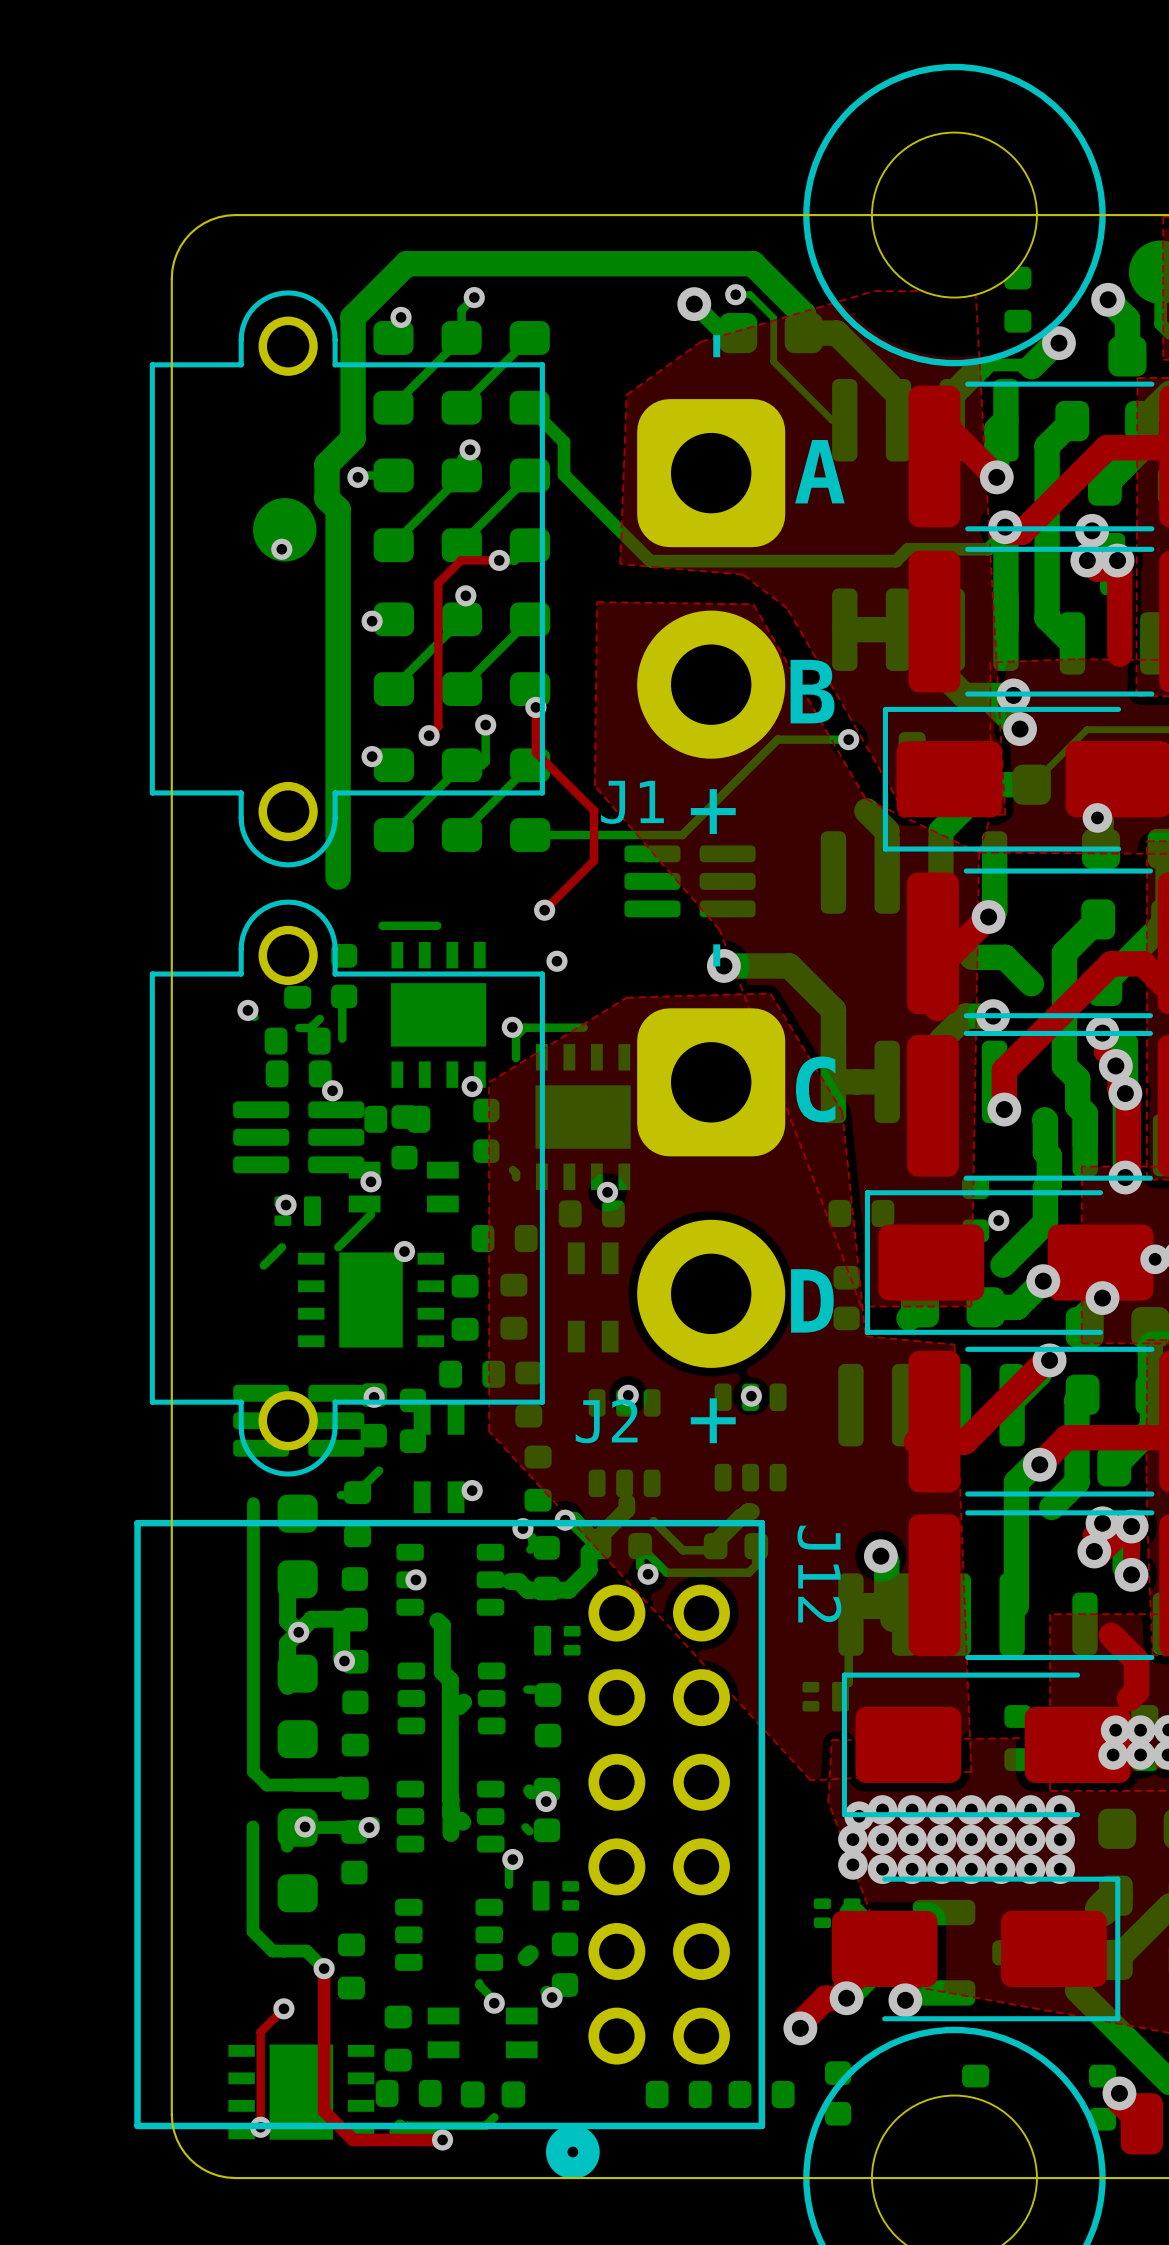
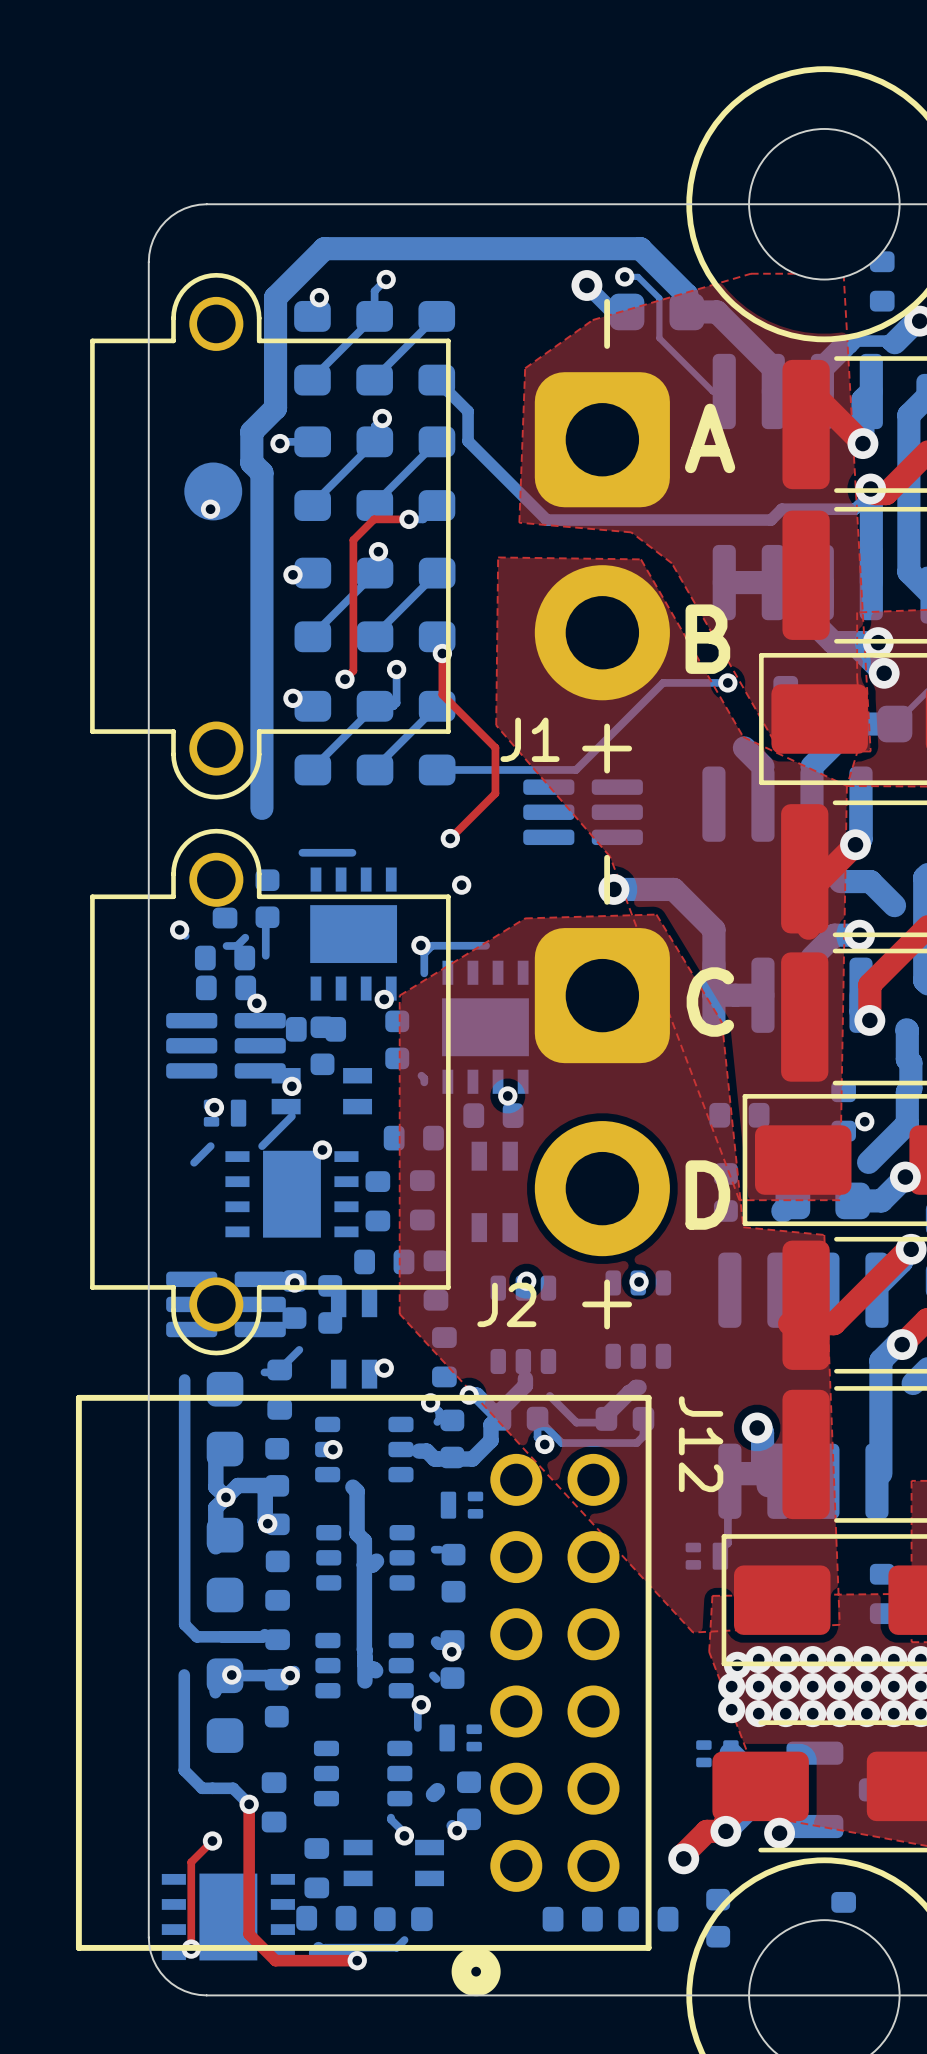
board edge: (277, 215) (226, 215) (203, 223) (190, 233) (180, 246) (173, 262) (171, 278) (171, 2114) (173, 2131) (180, 2146) (190, 2159) (203, 2169) (226, 2177) (277, 2178) -> (206, 204) (184, 208) (165, 221) (153, 239) (148, 262) (148, 1937) (153, 1959) (165, 1978) (184, 1991) (206, 1995)

